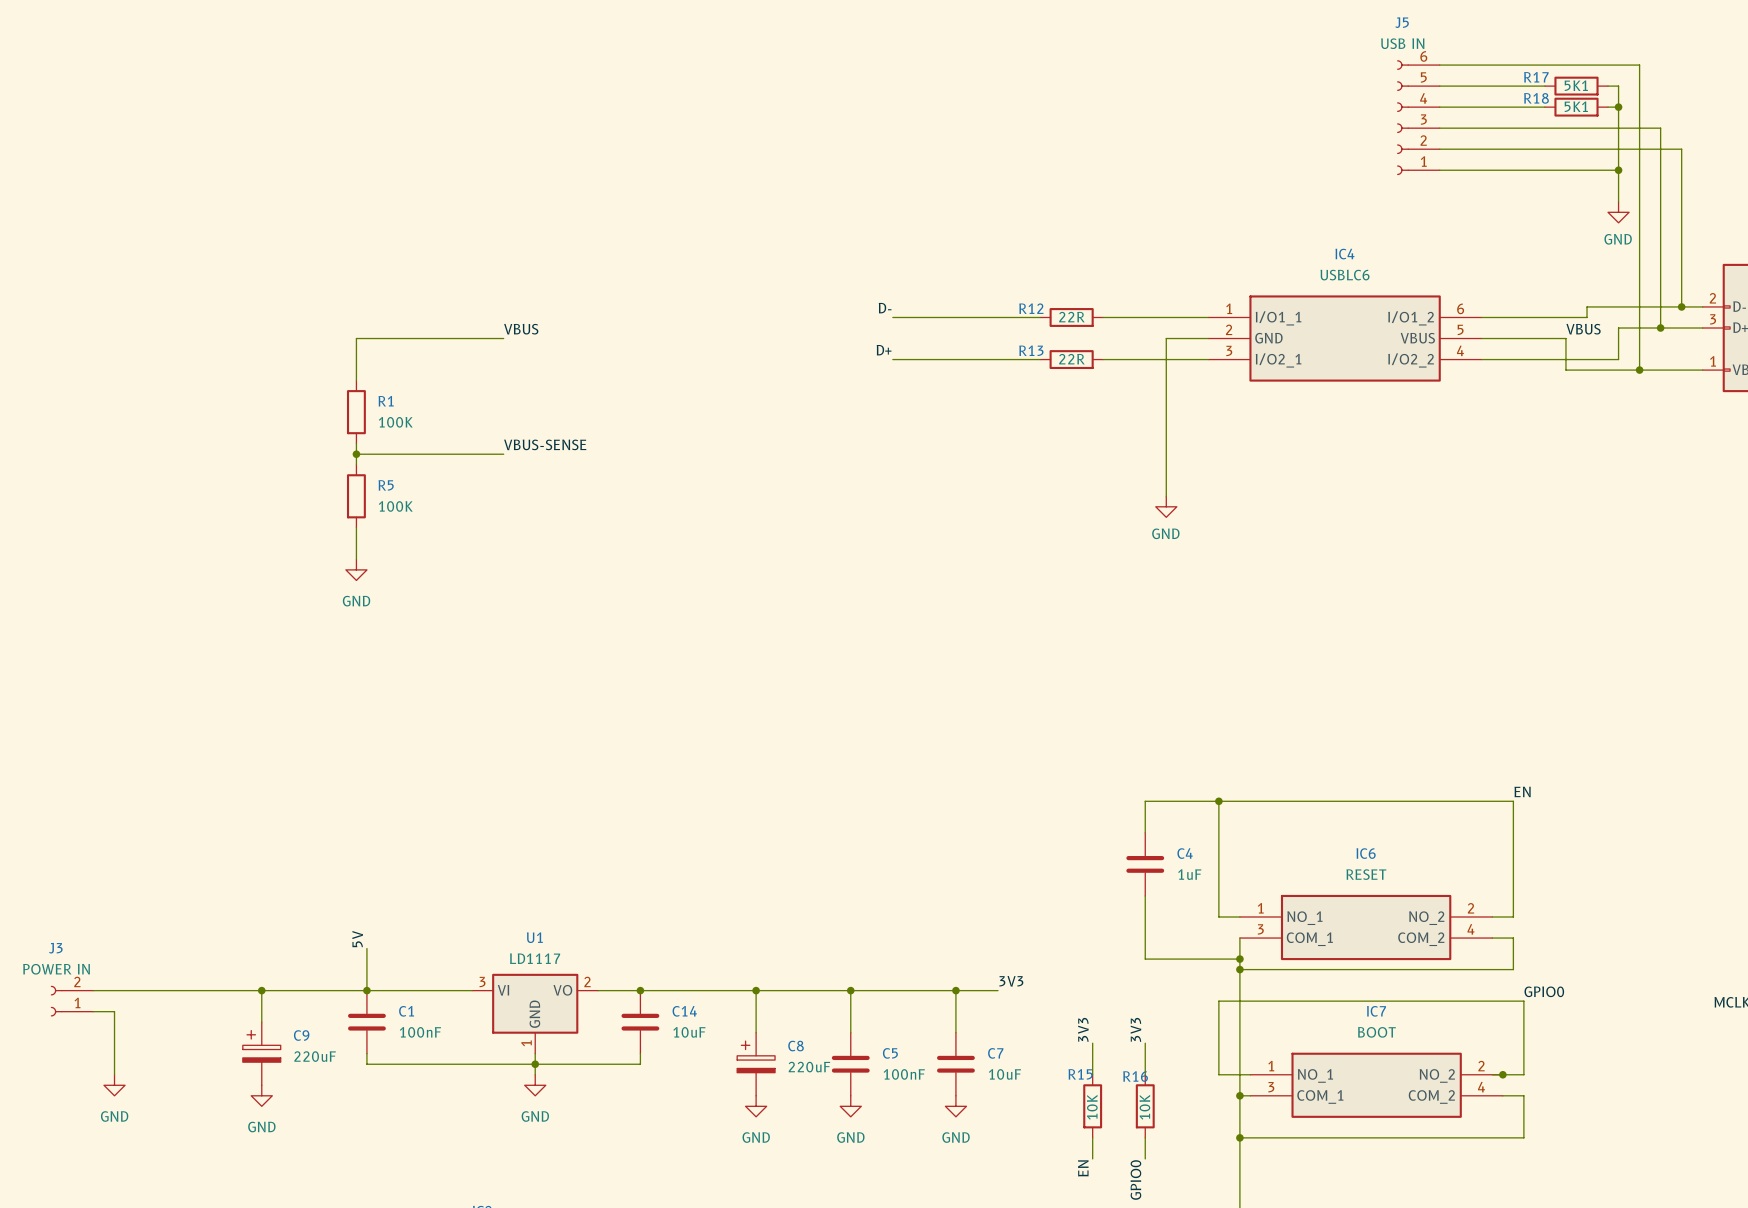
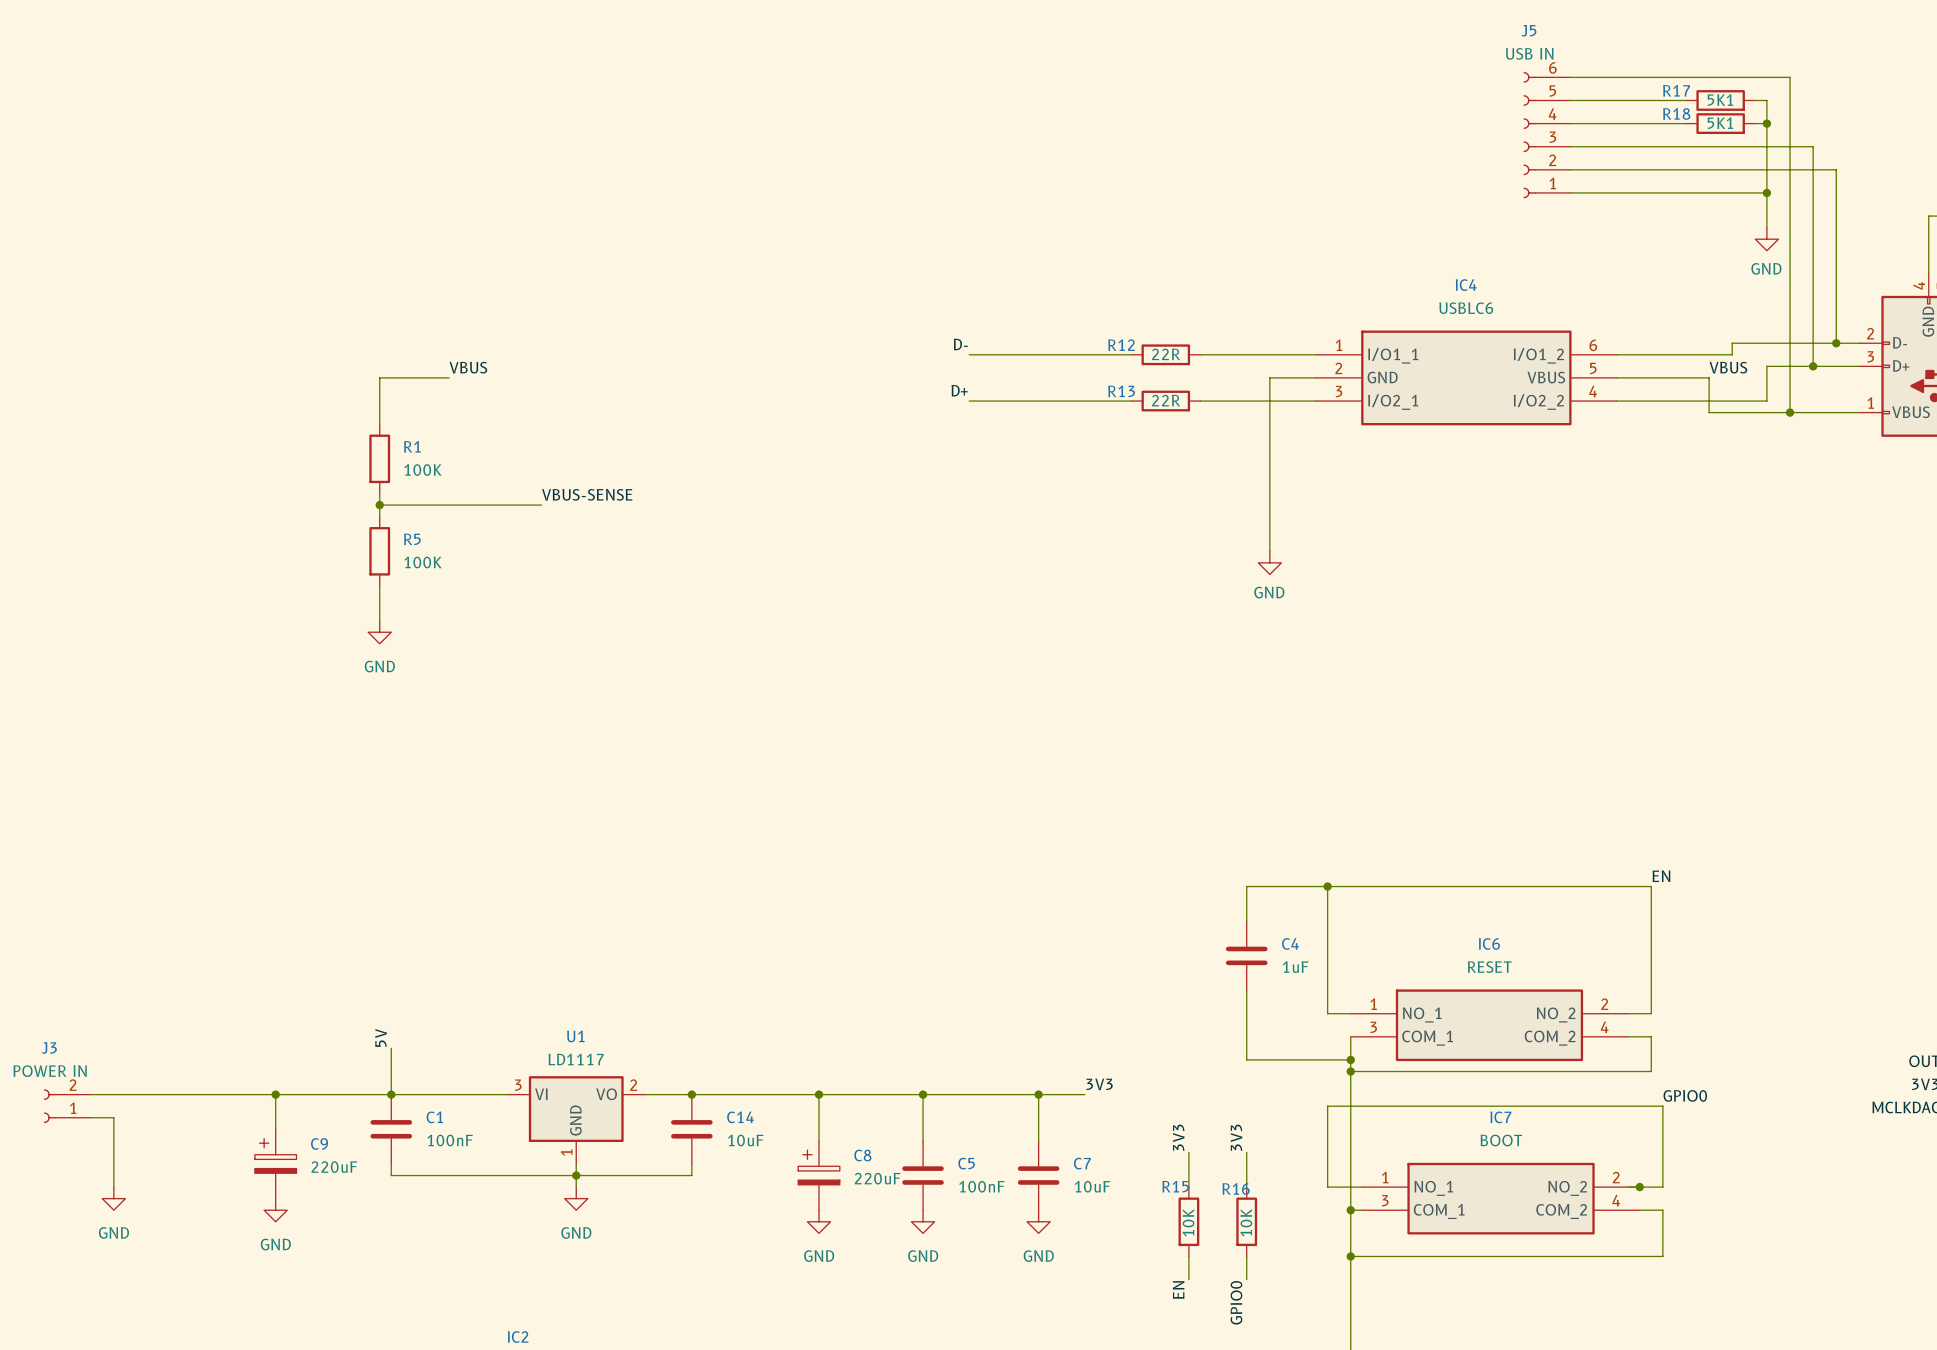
label position: VBUS (521, 329) -> VBUS (468, 367)
wire: (419, 338) (503, 338) -> none

